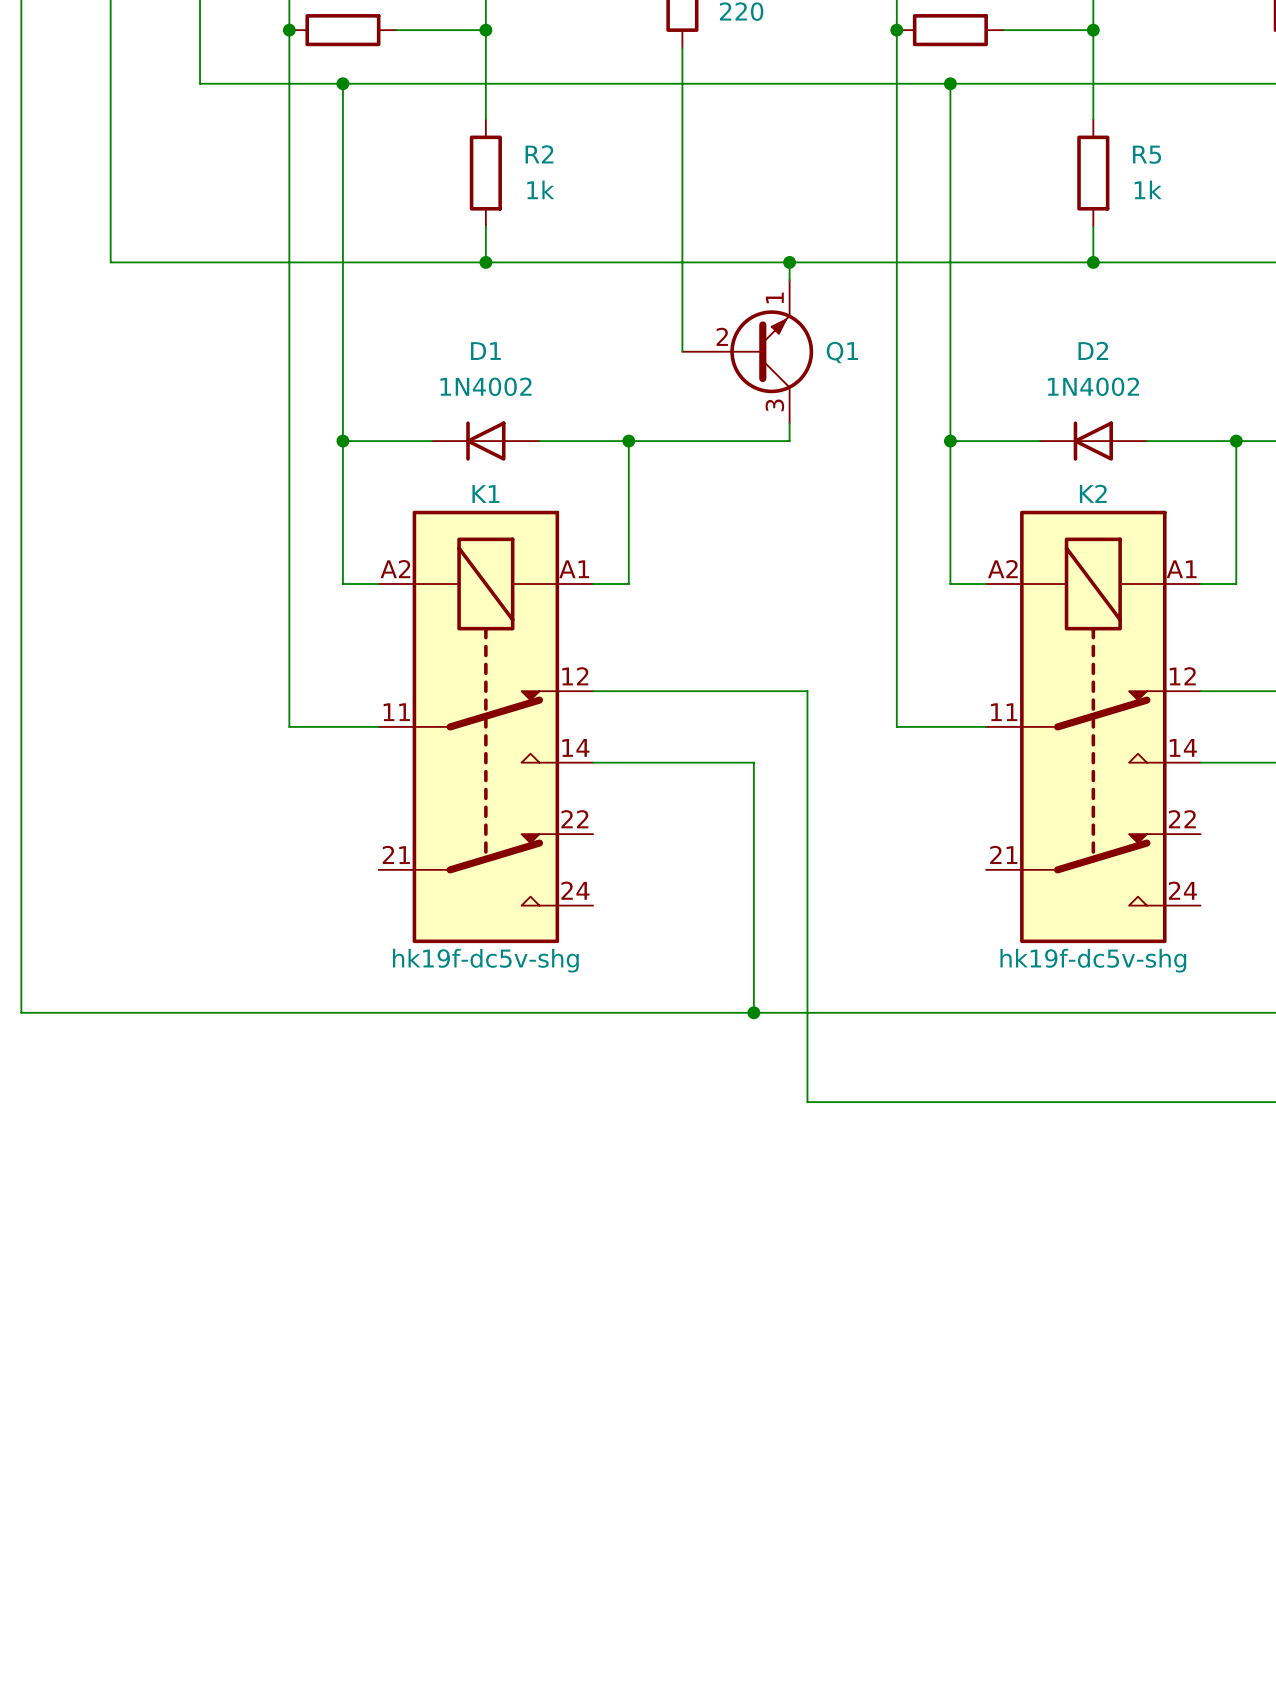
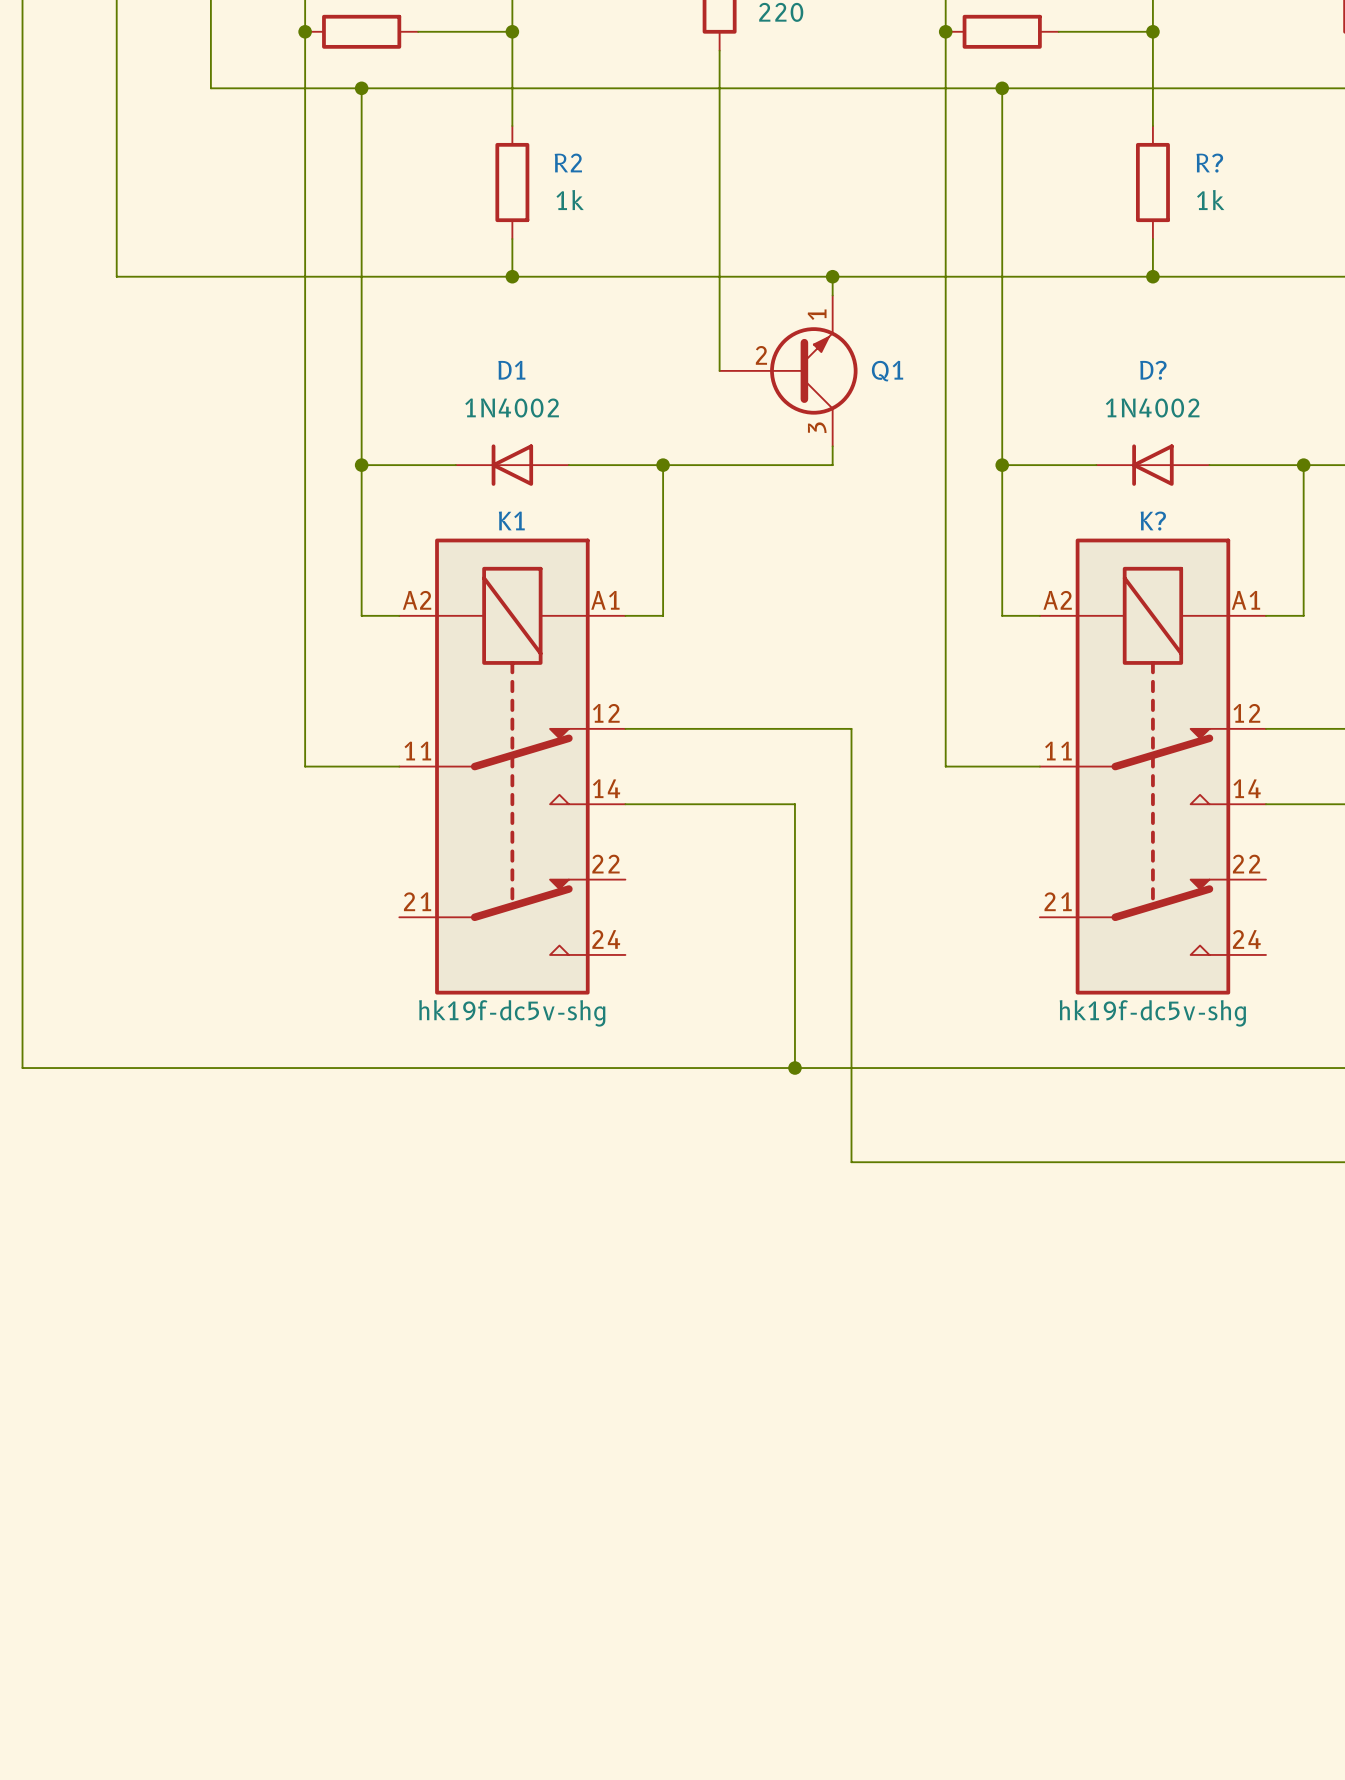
R5 name: R5 (1147, 154) -> R? (1209, 163)
D2 name: D2 (1093, 350) -> D? (1153, 370)
K2 name: K2 (1093, 493) -> K? (1153, 521)

